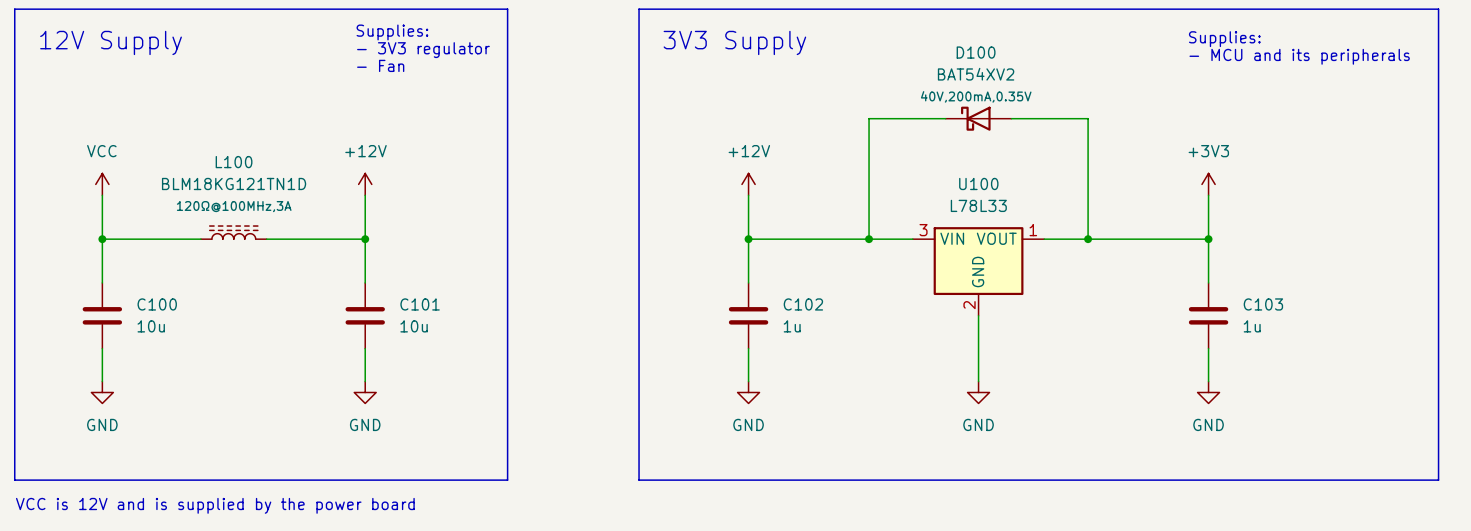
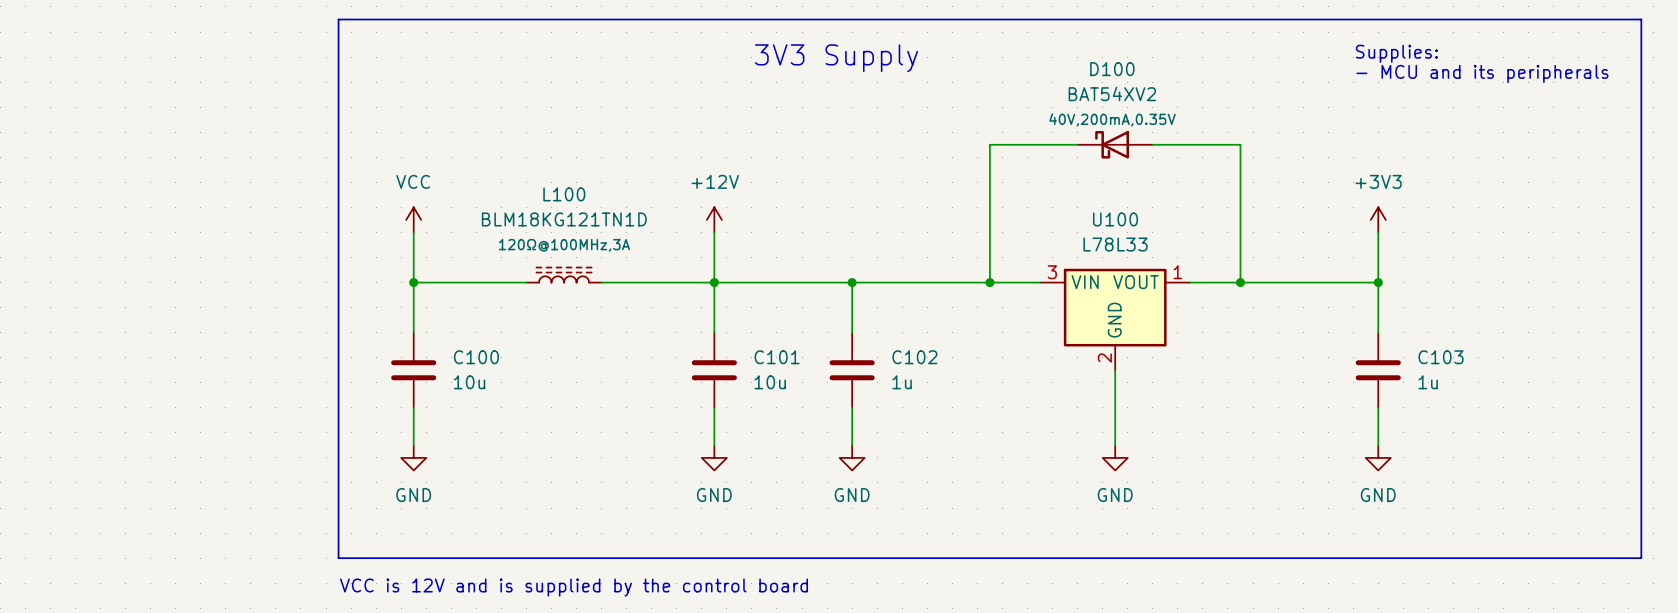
line: (299, 9) (14, 9) (14, 480) (299, 480) -> (338, 19) (338, 558)
line: (507, 9) (507, 480) -> (576, 19) (726, 19)
line: (639, 9) (639, 480) -> (576, 558) (726, 558)
text: Supplies: (392, 32) -> none
text: 12V Supply (111, 42) -> none
text: - 3V3 regulator (423, 50) -> none
text: - Fan (380, 65) -> none
power symbol: VCC (102, 184) -> none
power symbol: +12V (365, 184) -> VCC (413, 219)
power symbol position: +12V (748, 184) -> +12V (714, 219)
wire: (102, 195) (102, 282) -> none
wire: none -> (714, 232) (714, 332)
wire: (748, 195) (748, 239) -> (601, 282) (852, 282)
L100 position: (233, 232) -> (564, 275)
wire: (102, 239) (200, 239) -> none
junction: (102, 239) -> none
wire: (266, 239) (365, 239) -> (526, 282) (413, 282)
junction: none -> (714, 282)
C101 name: C101 (420, 304) -> C100 (476, 357)
C100: 10u (102, 315) -> none
C101: none -> 10u (714, 370)
wire: (102, 348) (102, 381) -> none
wire: none -> (714, 407) (714, 445)
power symbol: GND (102, 392) -> none
power symbol: none -> GND (714, 457)
text: VCC is 12V and is supplied by the power board (215, 505) -> none
text: none -> VCC is 12V and is supplied by the control board (573, 587)

